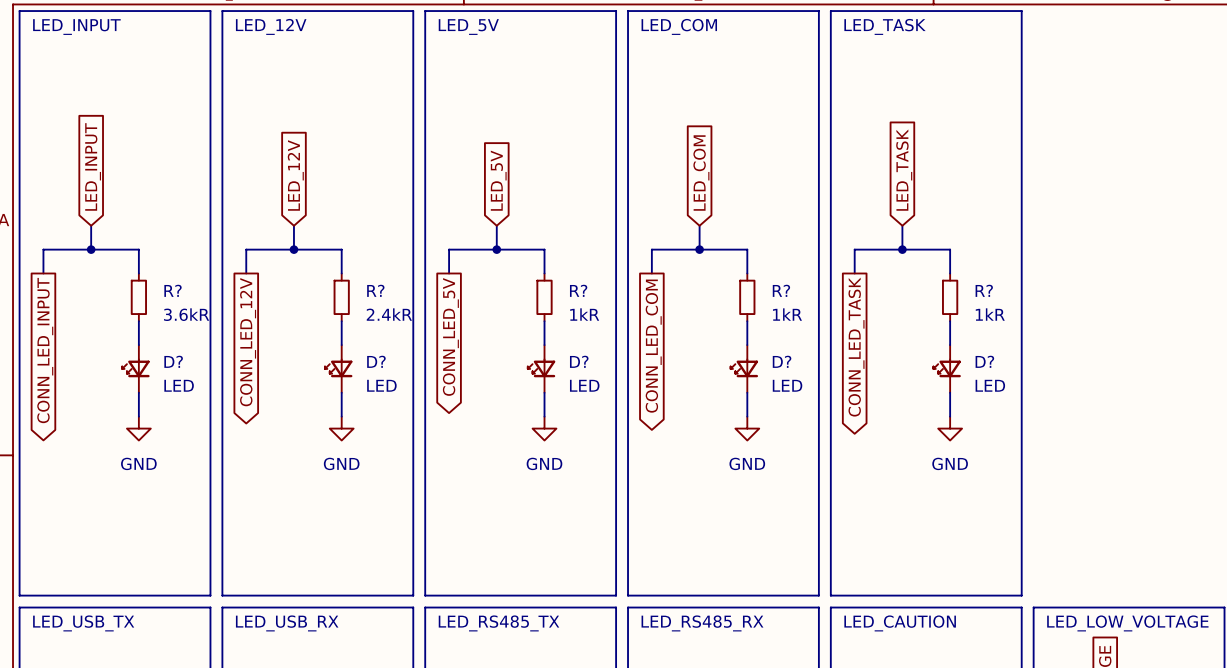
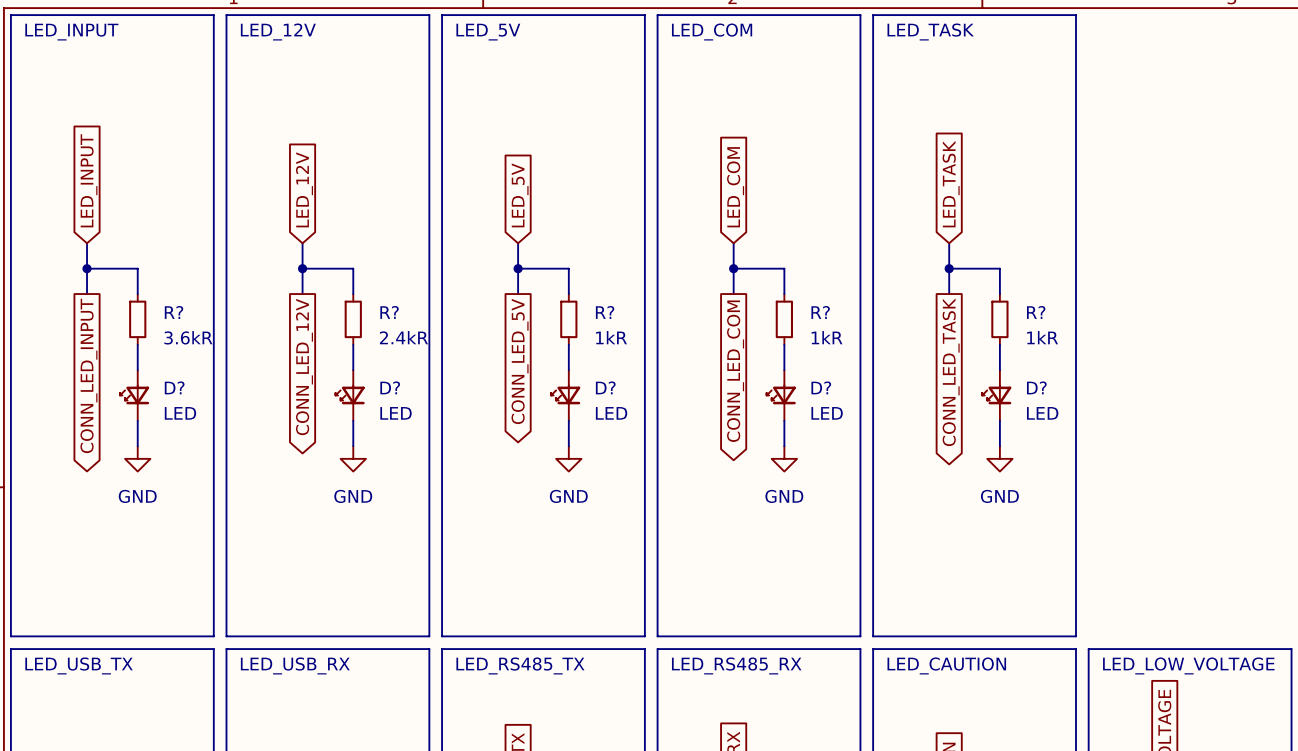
wire: (91, 249) (43, 249) (43, 273) -> (87, 268) (87, 294)
wire: (293, 249) (246, 249) (246, 273) -> (302, 268) (302, 294)
wire: (496, 249) (449, 249) (449, 273) -> (518, 268) (518, 294)
wire: (699, 249) (651, 249) (651, 273) -> (733, 268) (733, 294)
wire: (902, 249) (854, 249) (854, 273) -> (949, 268) (949, 294)
global label position: CONN_LED_5V (450, 336) -> CONN_LED_5V (520, 361)
global label position: CONN_LED_12V (248, 342) -> CONN_LED_12V (304, 367)
global label position: CONN_LED_COM (653, 346) -> CONN_LED_COM (735, 371)
global label position: CONN_LED_TASK (856, 347) -> CONN_LED_TASK (951, 372)
global label position: CONN_LED_INPUT (45, 350) -> CONN_LED_INPUT (88, 375)

